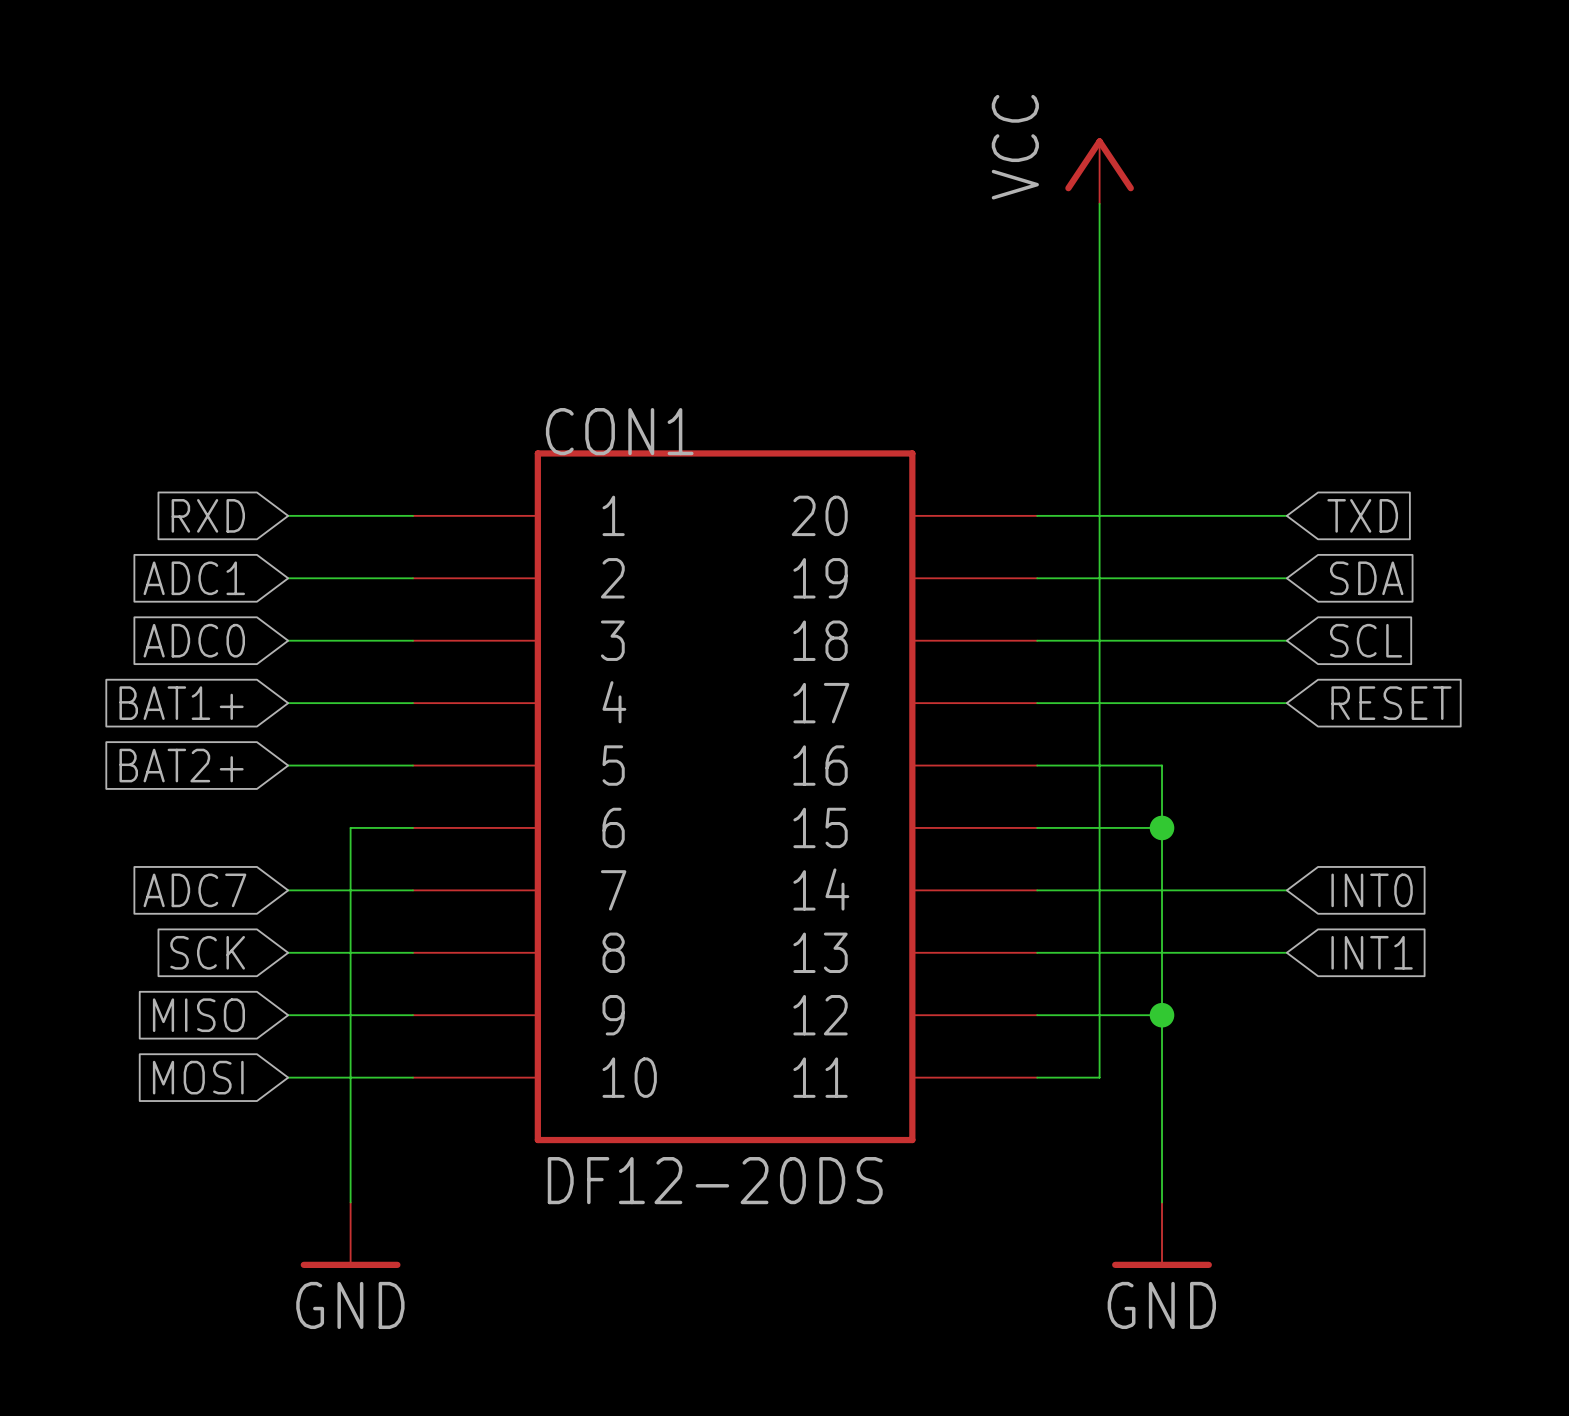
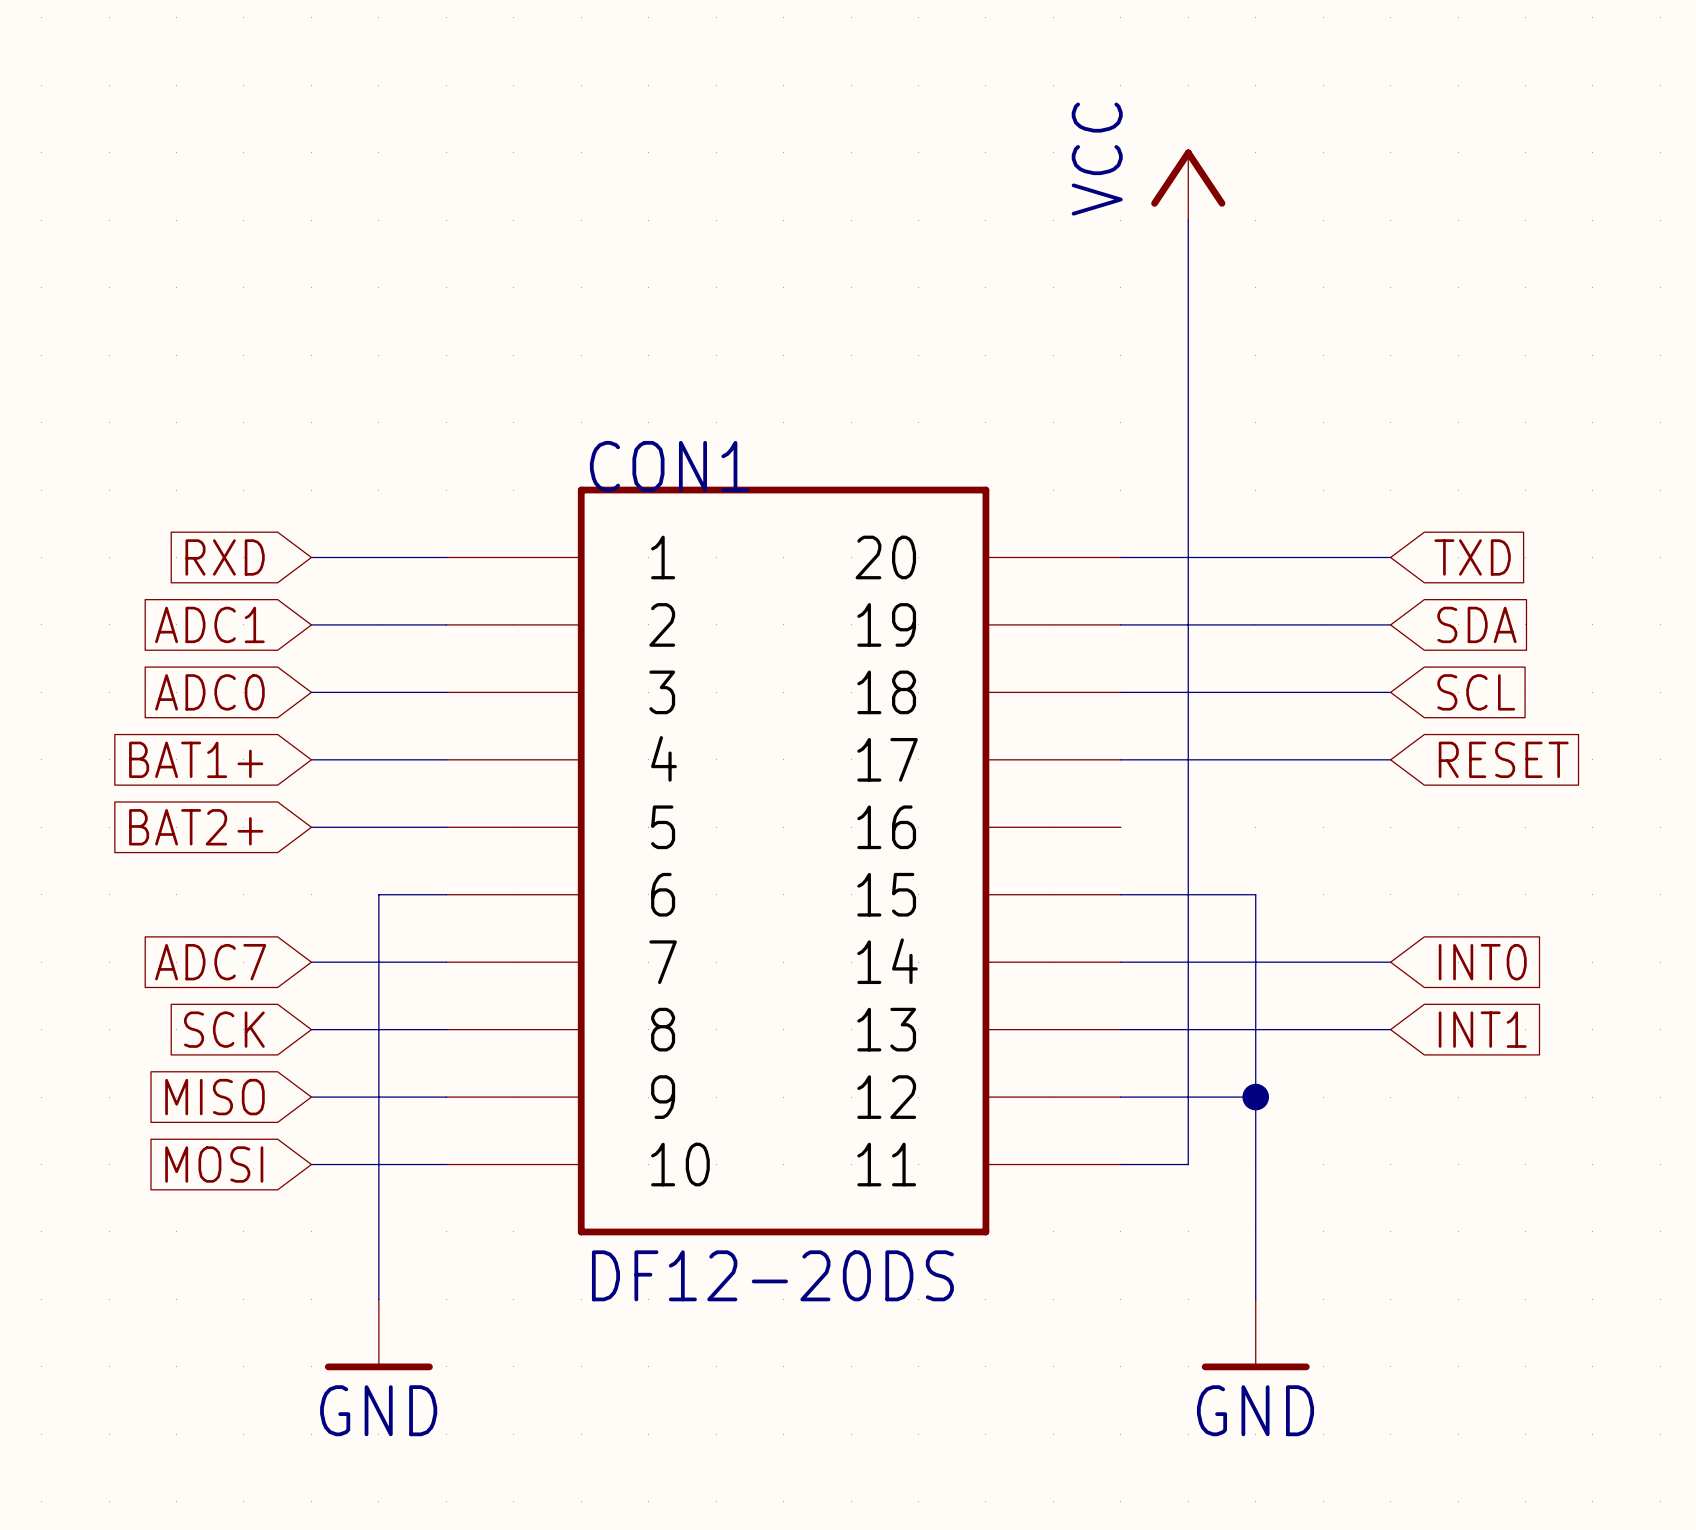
wire: (1037, 765) (1162, 765) (1162, 827) -> none
junction: (1162, 827) -> none

